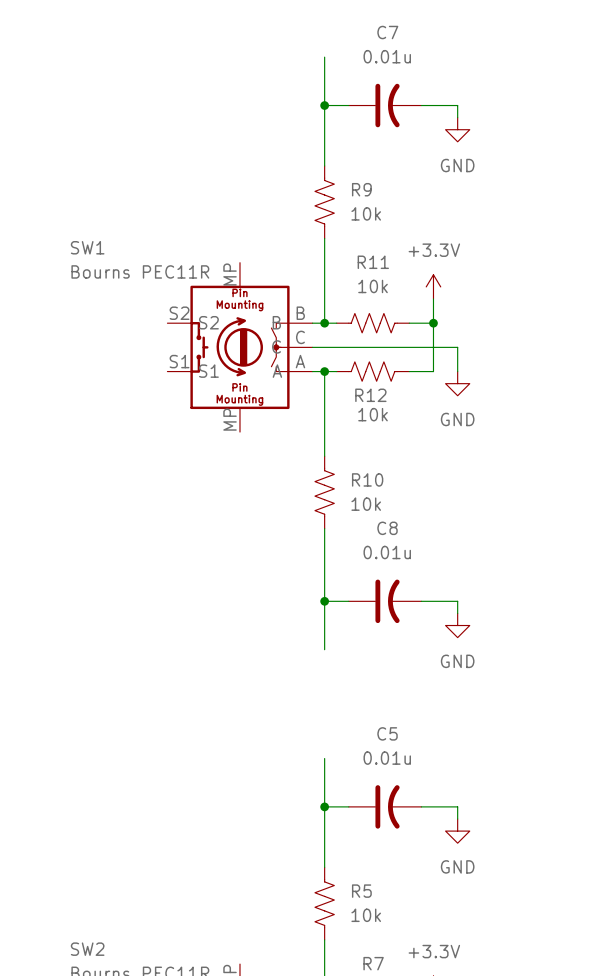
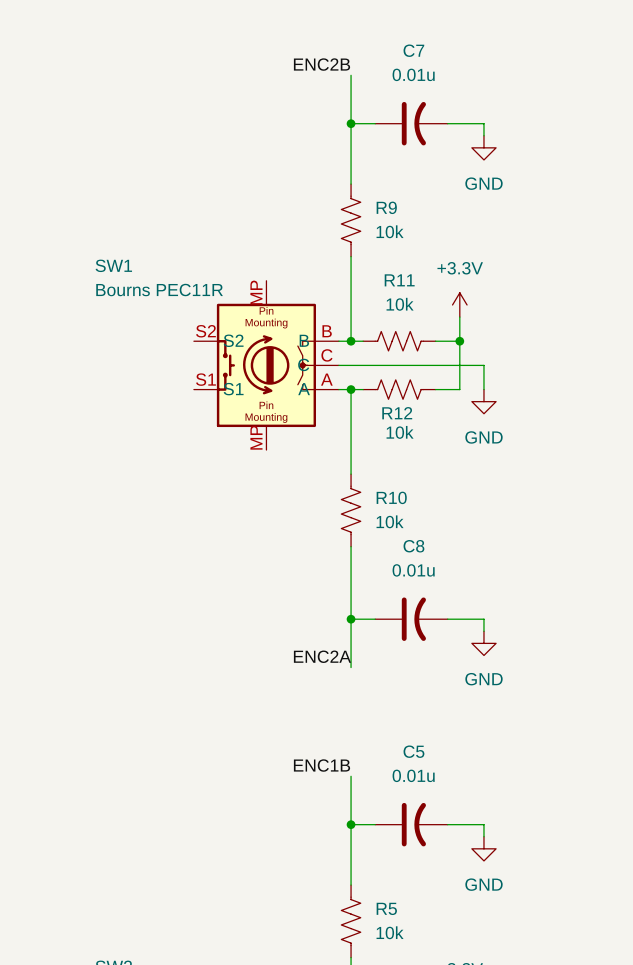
label: none -> ENC2B (322, 64)
label: none -> ENC2A (322, 656)
label: none -> ENC1B (322, 765)

